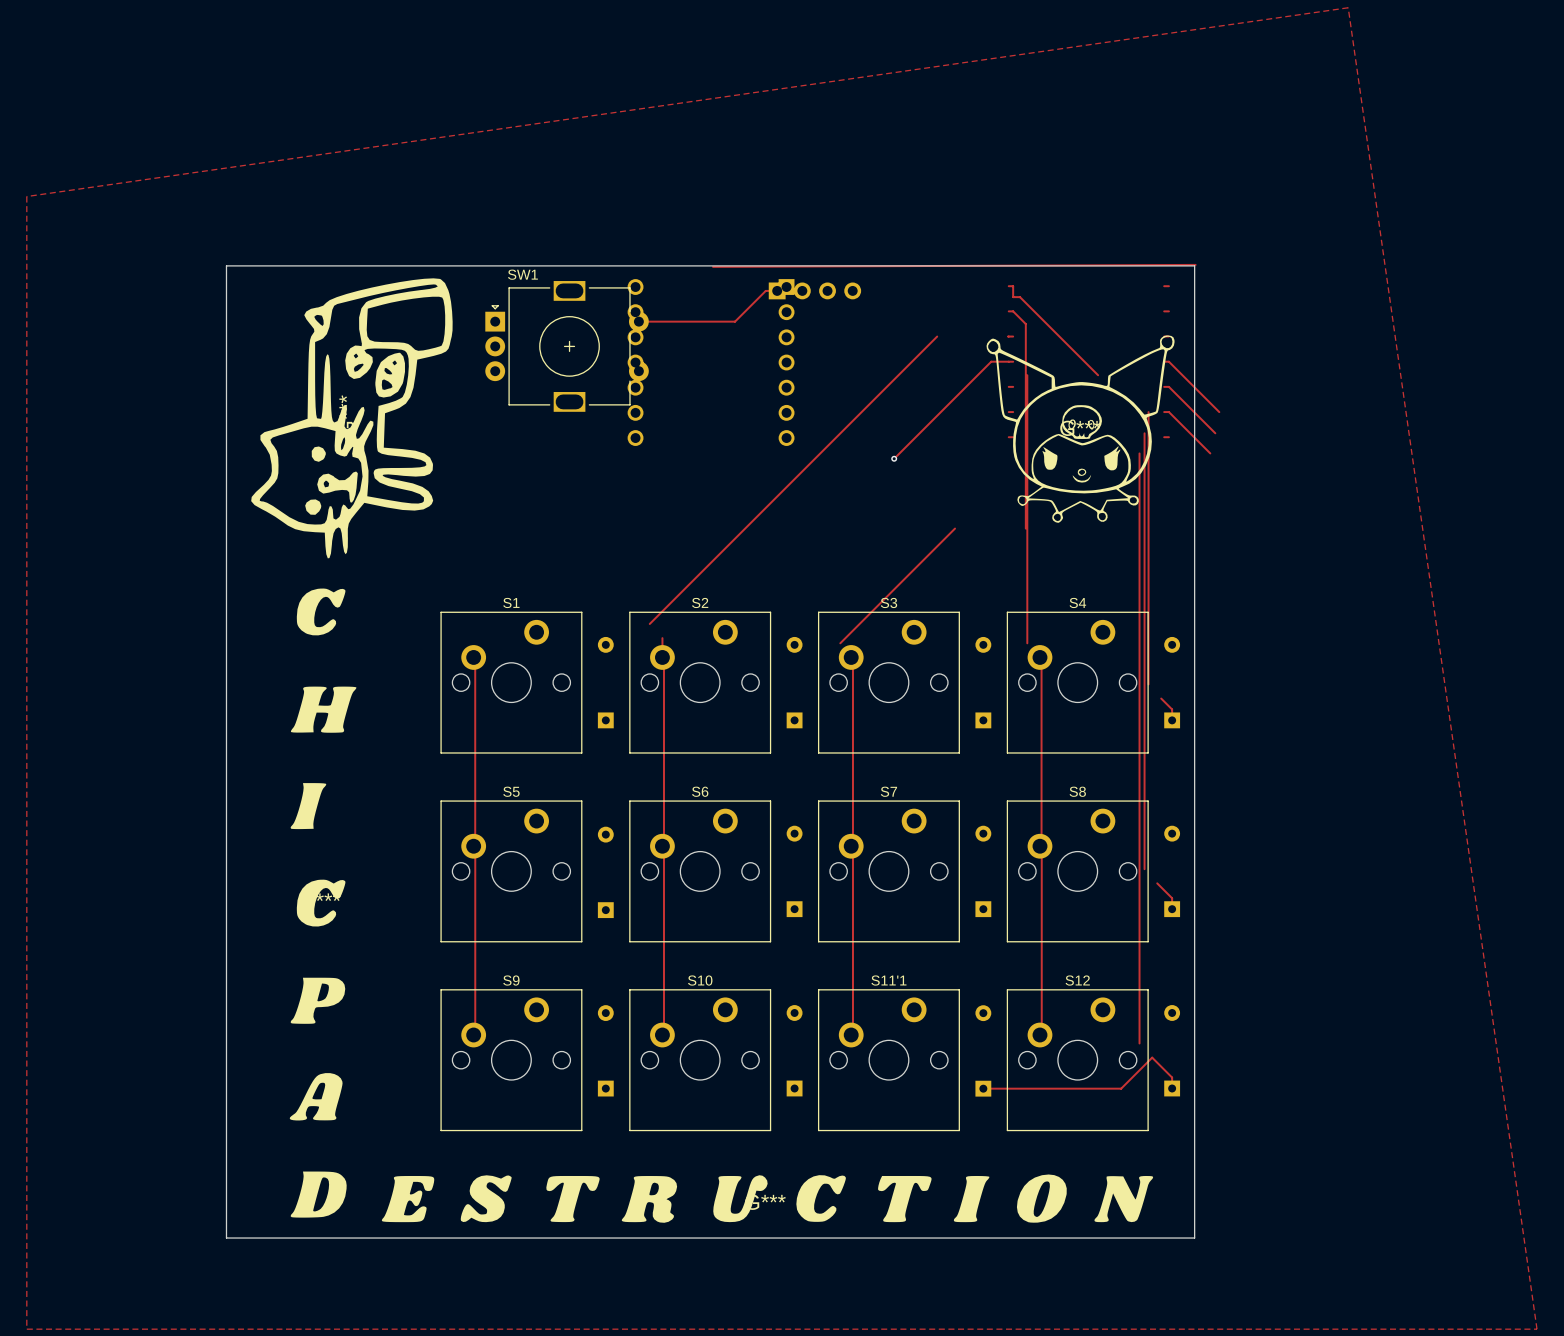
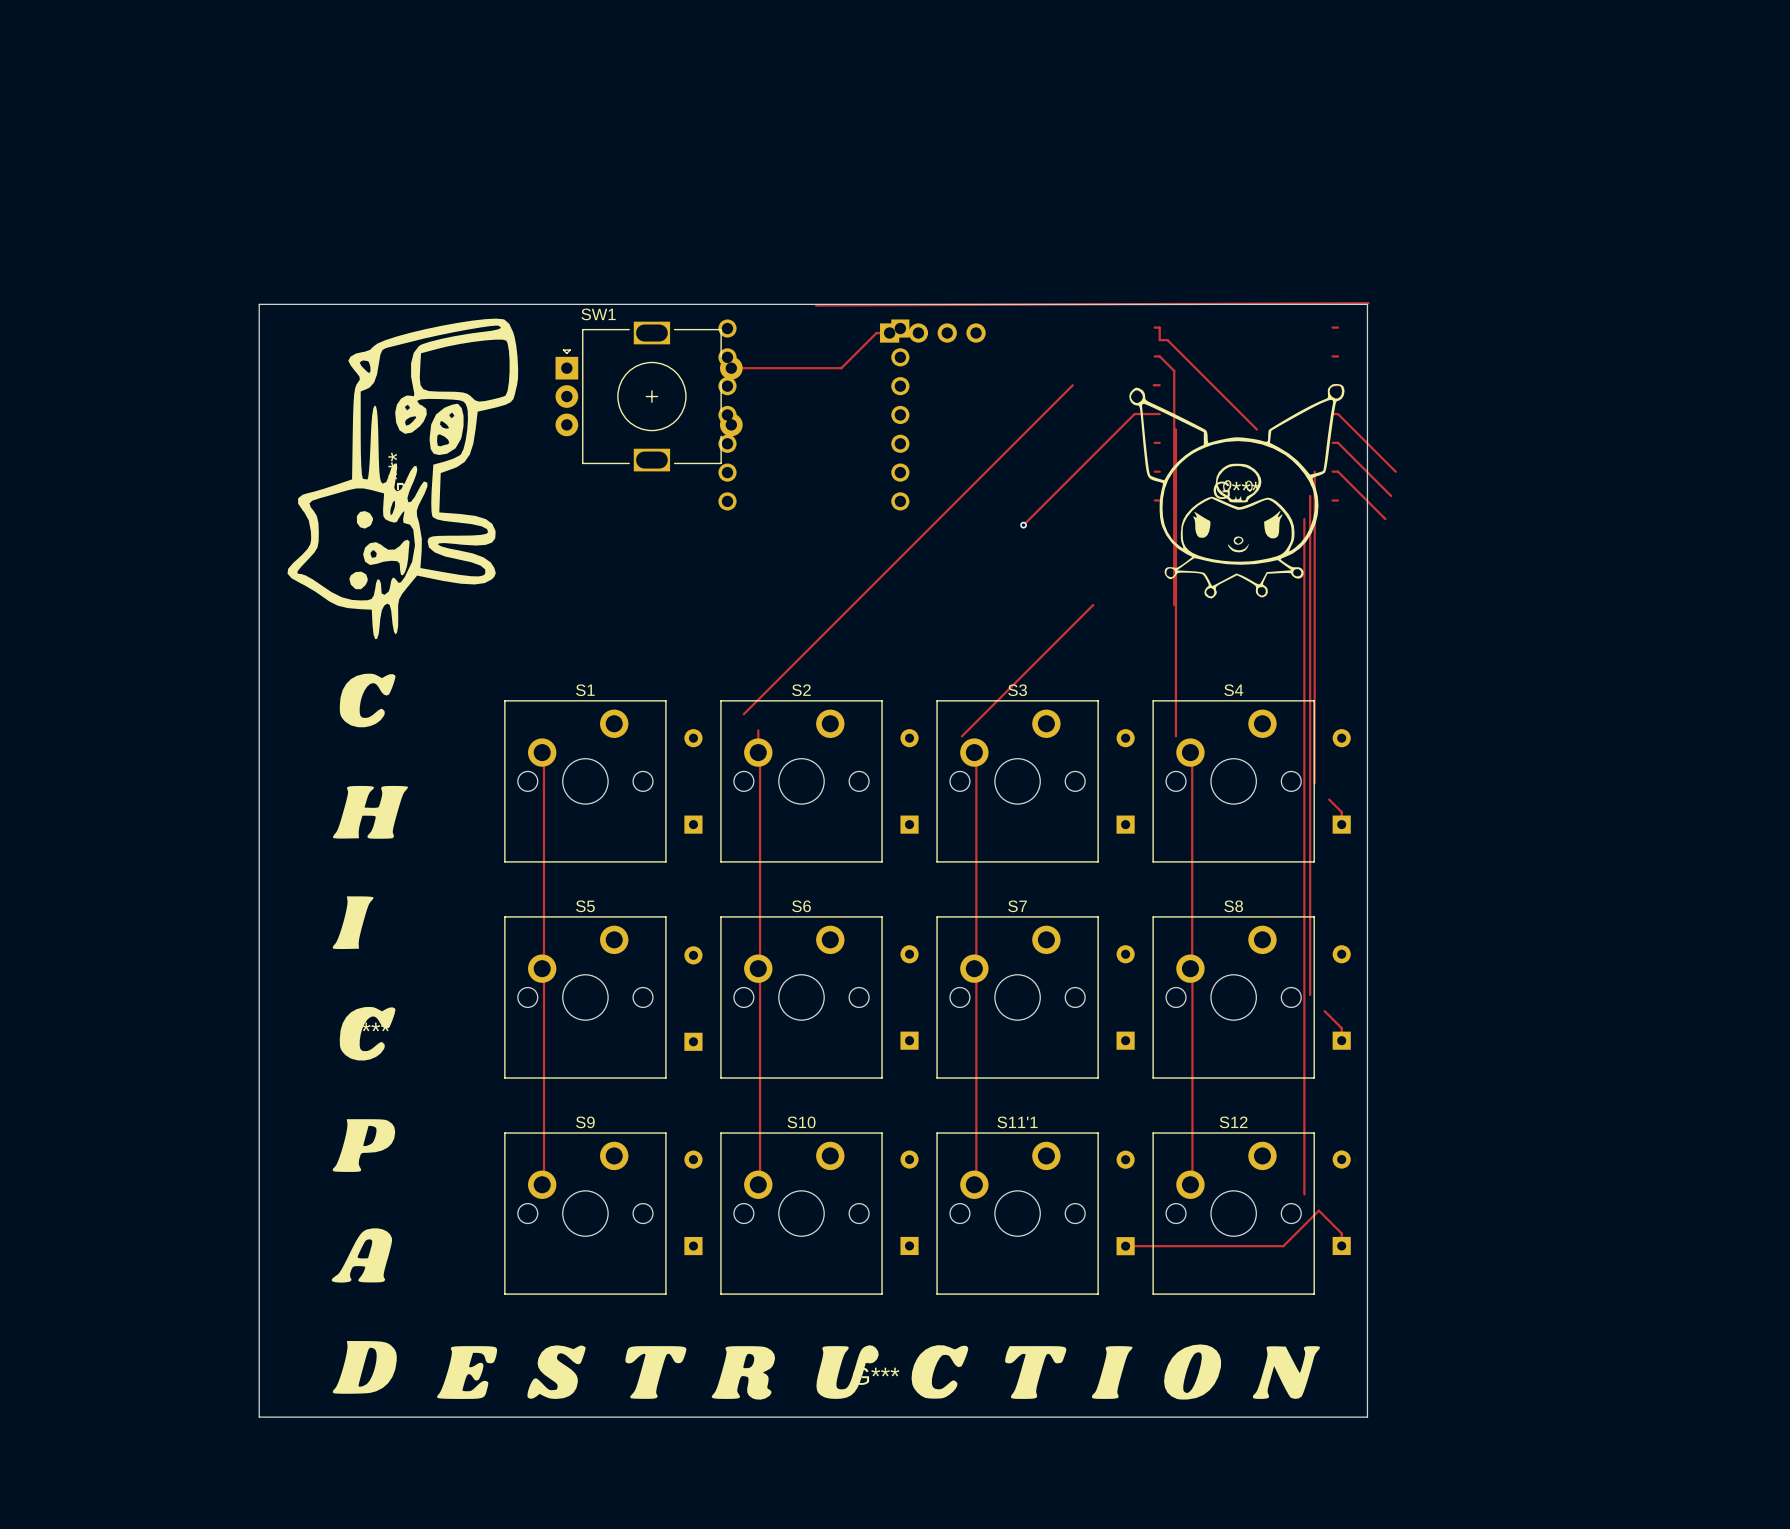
zone outline: (1348, 7) (1537, 1329) (26, 1329) (26, 196) (1348, 7) -> none

